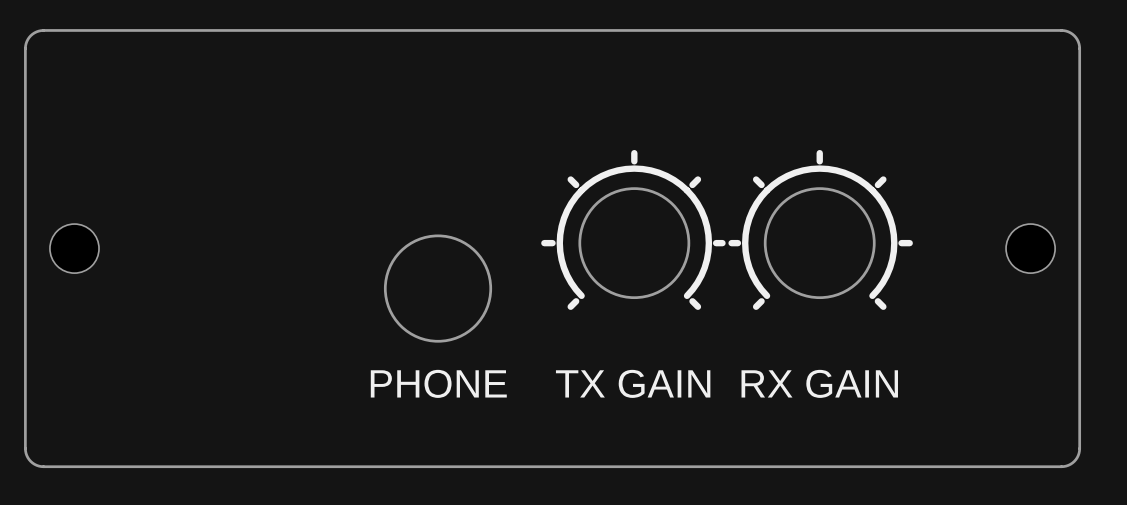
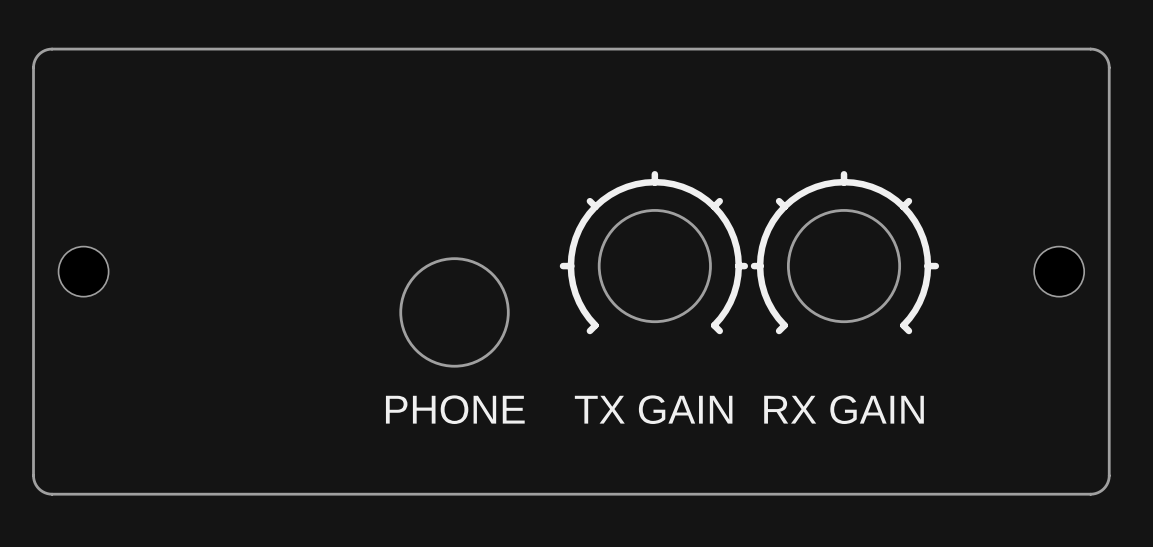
line: (581, 295) (567, 275) (560, 251) (561, 226) (567, 210) (576, 196) (594, 180) (609, 172) (634, 168) (658, 172) (673, 180) (687, 190) (701, 210) (708, 234) (708, 251) (701, 275) (687, 295) -> none
line: (767, 295) (752, 275) (745, 251) (745, 234) (752, 210) (761, 196) (780, 180) (795, 172) (819, 168) (836, 170) (859, 180) (878, 196) (886, 210) (893, 234) (893, 251) (886, 275) (872, 295) -> none
line: none -> (595, 325) (583, 310) (573, 284) (571, 256) (575, 238) (589, 213) (602, 200) (627, 186) (654, 182) (673, 184) (699, 195) (720, 213) (734, 238) (738, 256) (736, 284) (725, 310) (714, 325)
line: none -> (784, 325) (772, 310) (762, 284) (760, 256) (764, 238) (778, 213) (791, 200) (816, 186) (844, 182) (862, 184) (888, 195) (909, 213) (923, 238) (927, 266) (925, 284) (915, 310) (903, 325)

